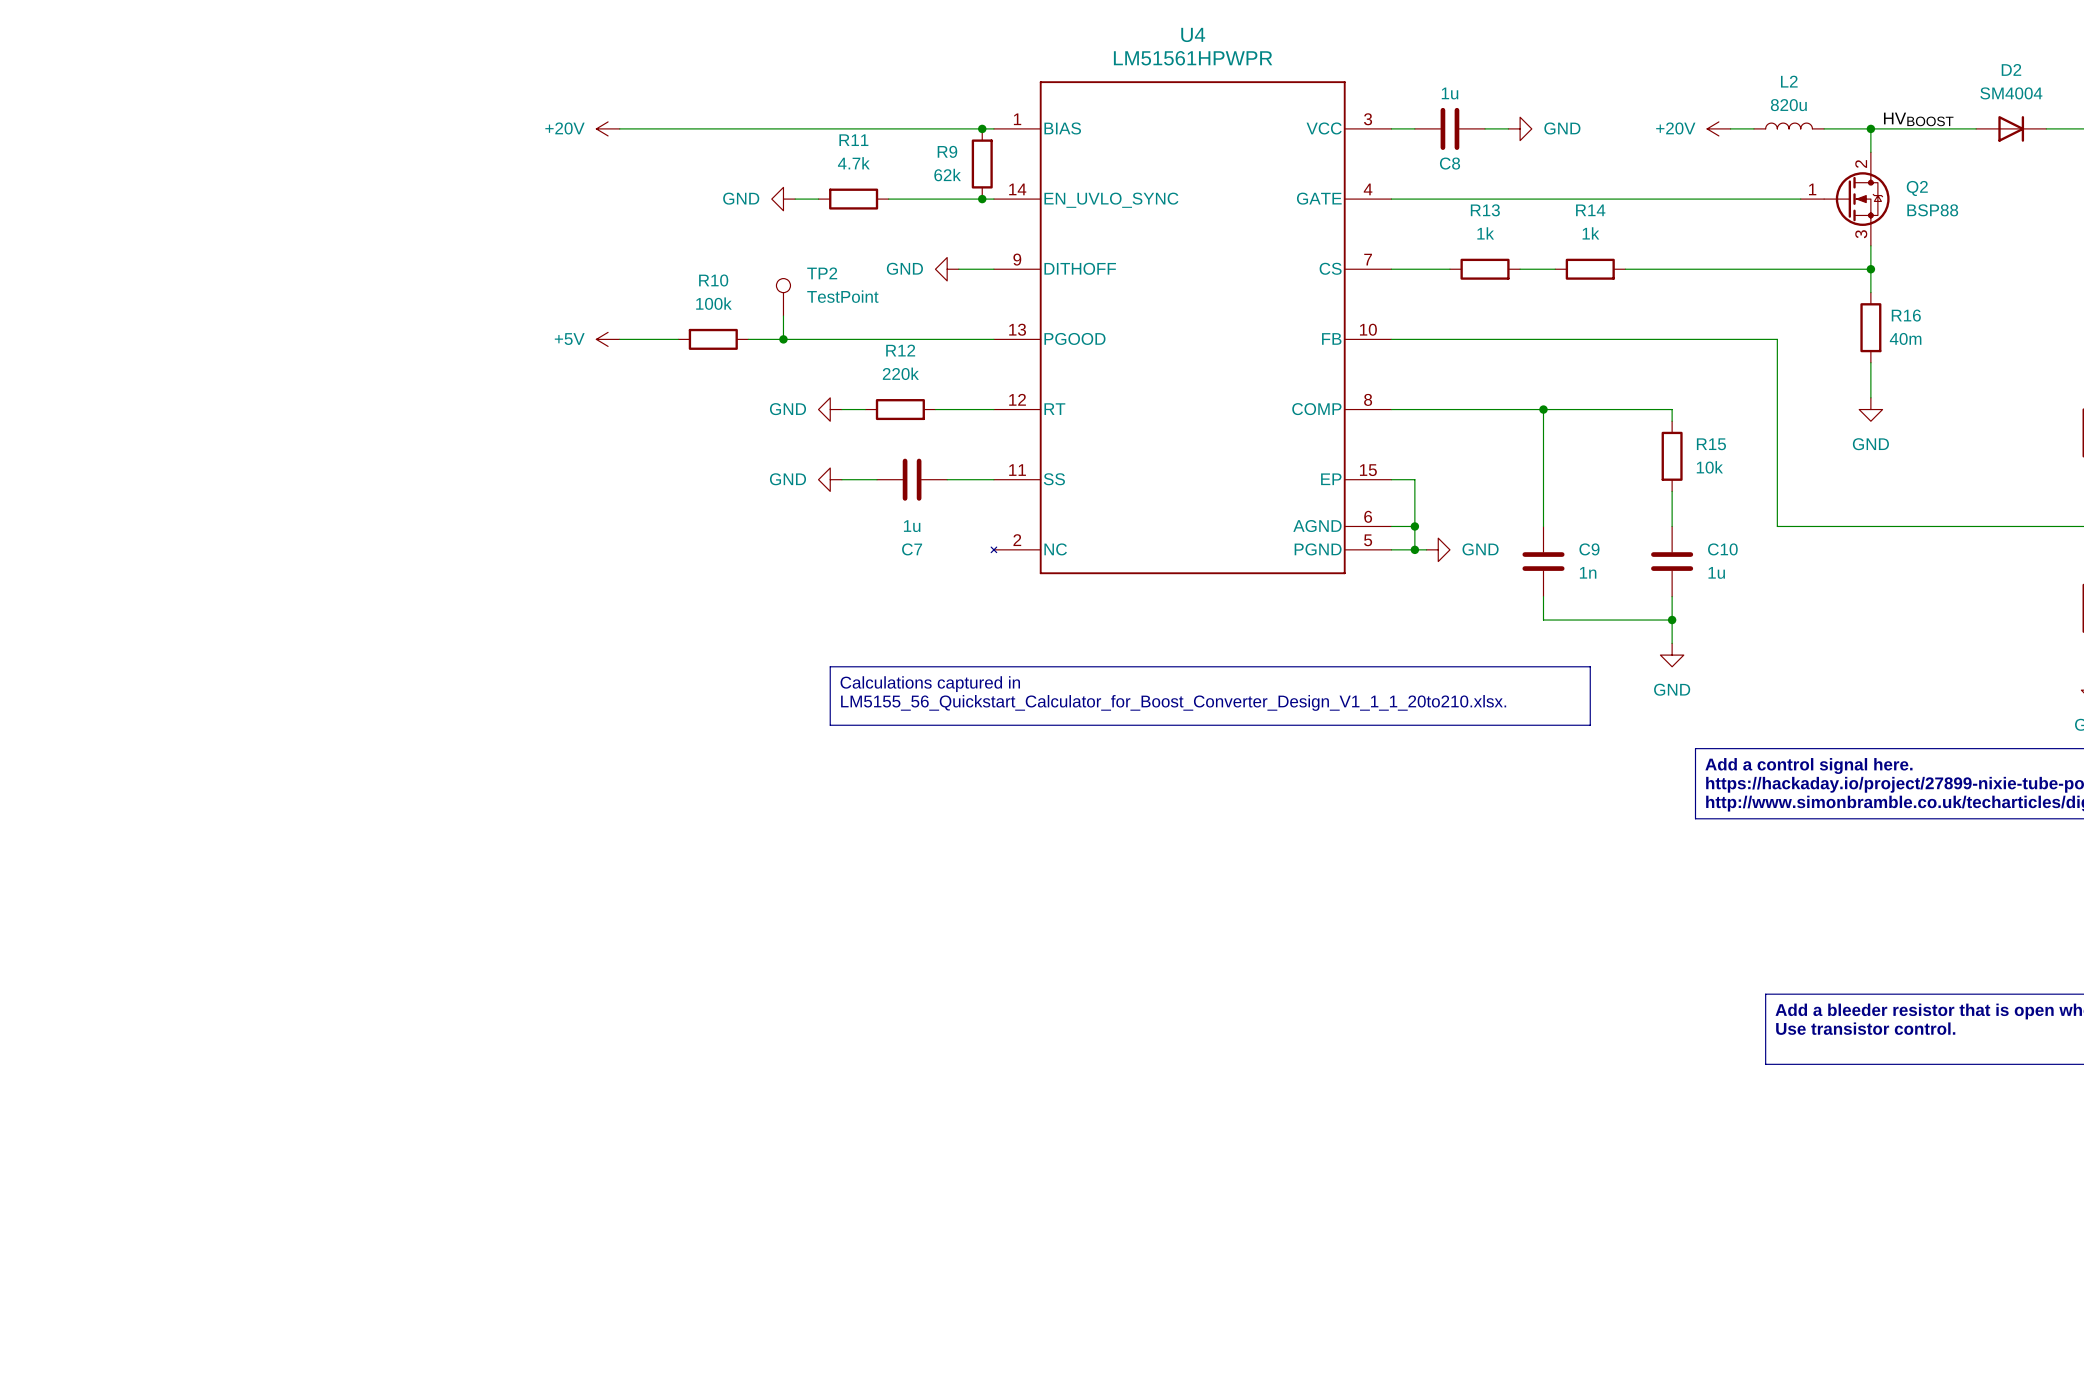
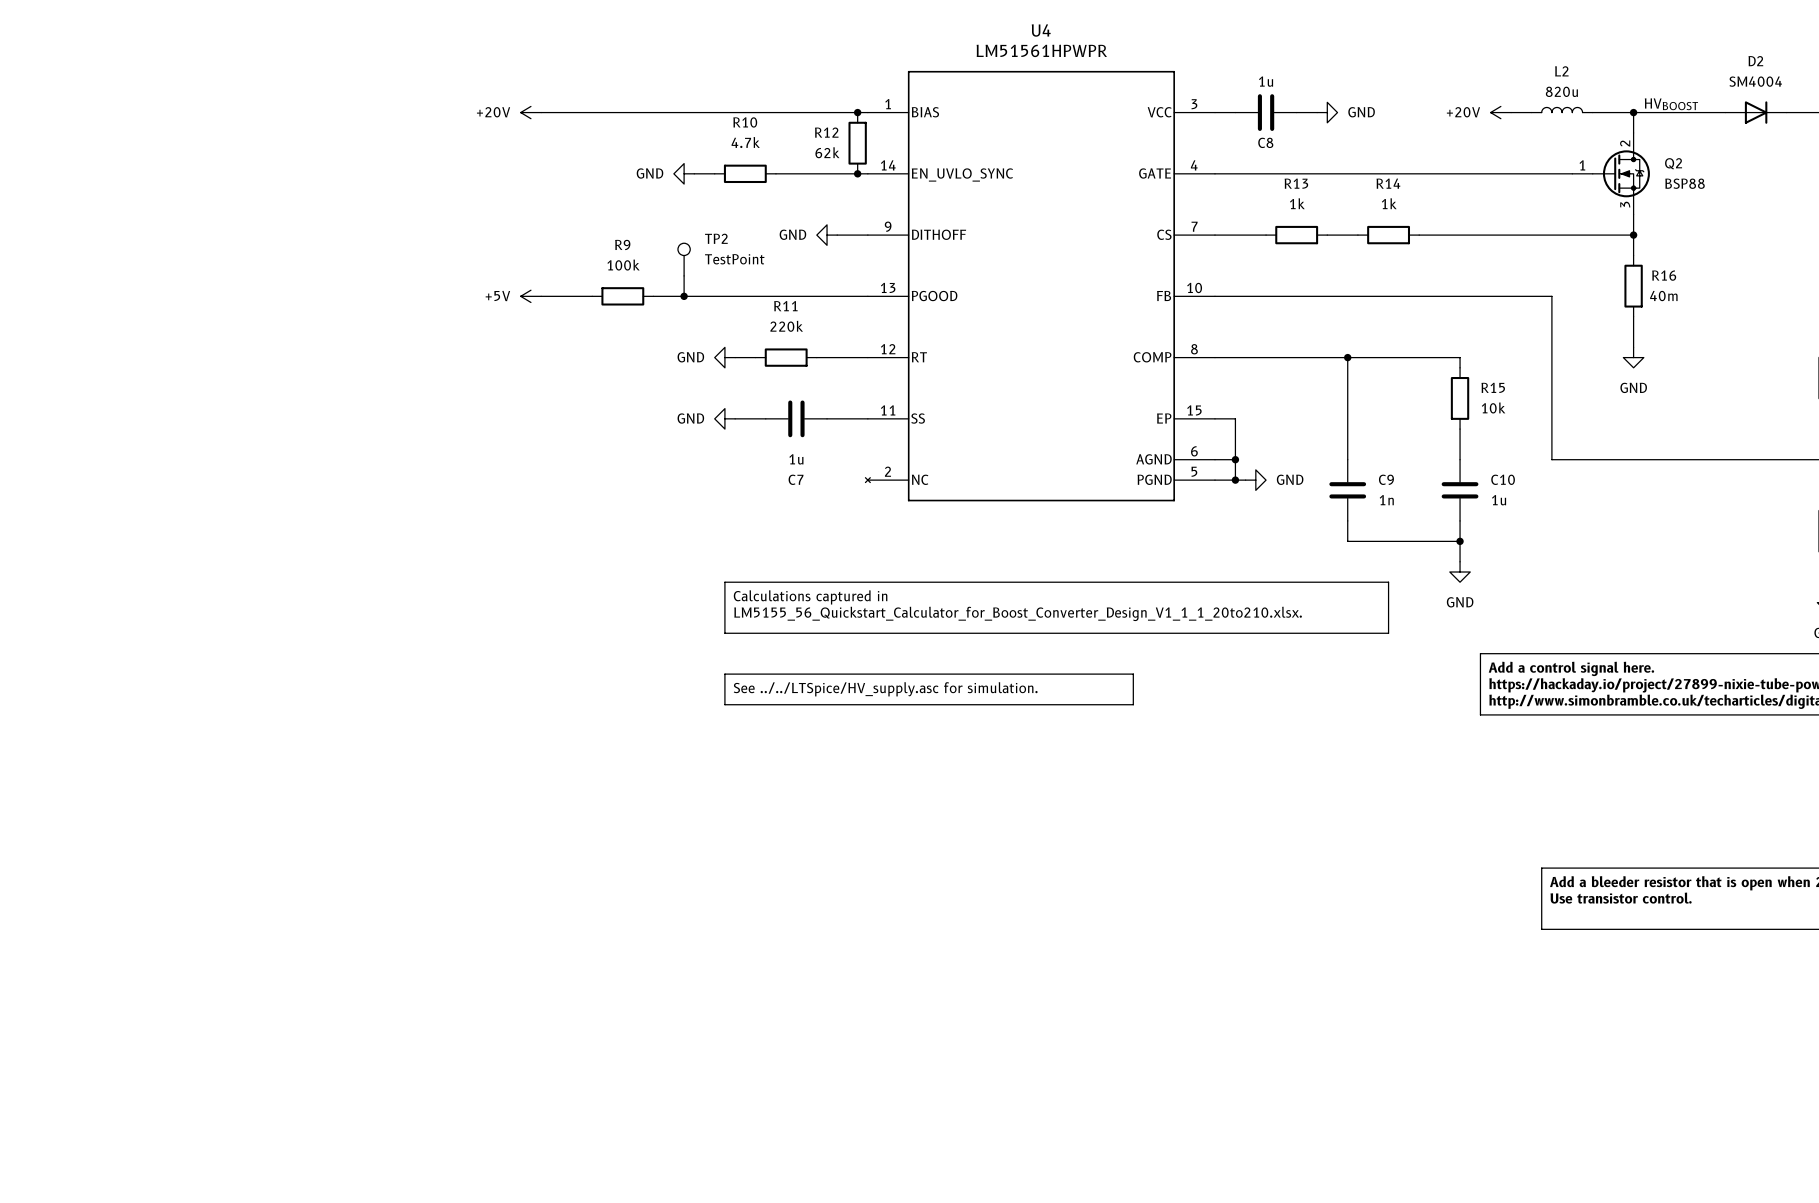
R11 name: R11 (853, 140) -> R10 (745, 122)
R9 name: R9 (947, 151) -> R12 (826, 132)
R10 name: R10 (713, 280) -> R9 (622, 244)
R12 name: R12 (900, 350) -> R11 (785, 306)
line: none -> (724, 674) (1133, 674) (1133, 704) (724, 704) (724, 674)
text: none -> See ../../LTSpice/HV_supply.asc for simulation. (885, 689)

